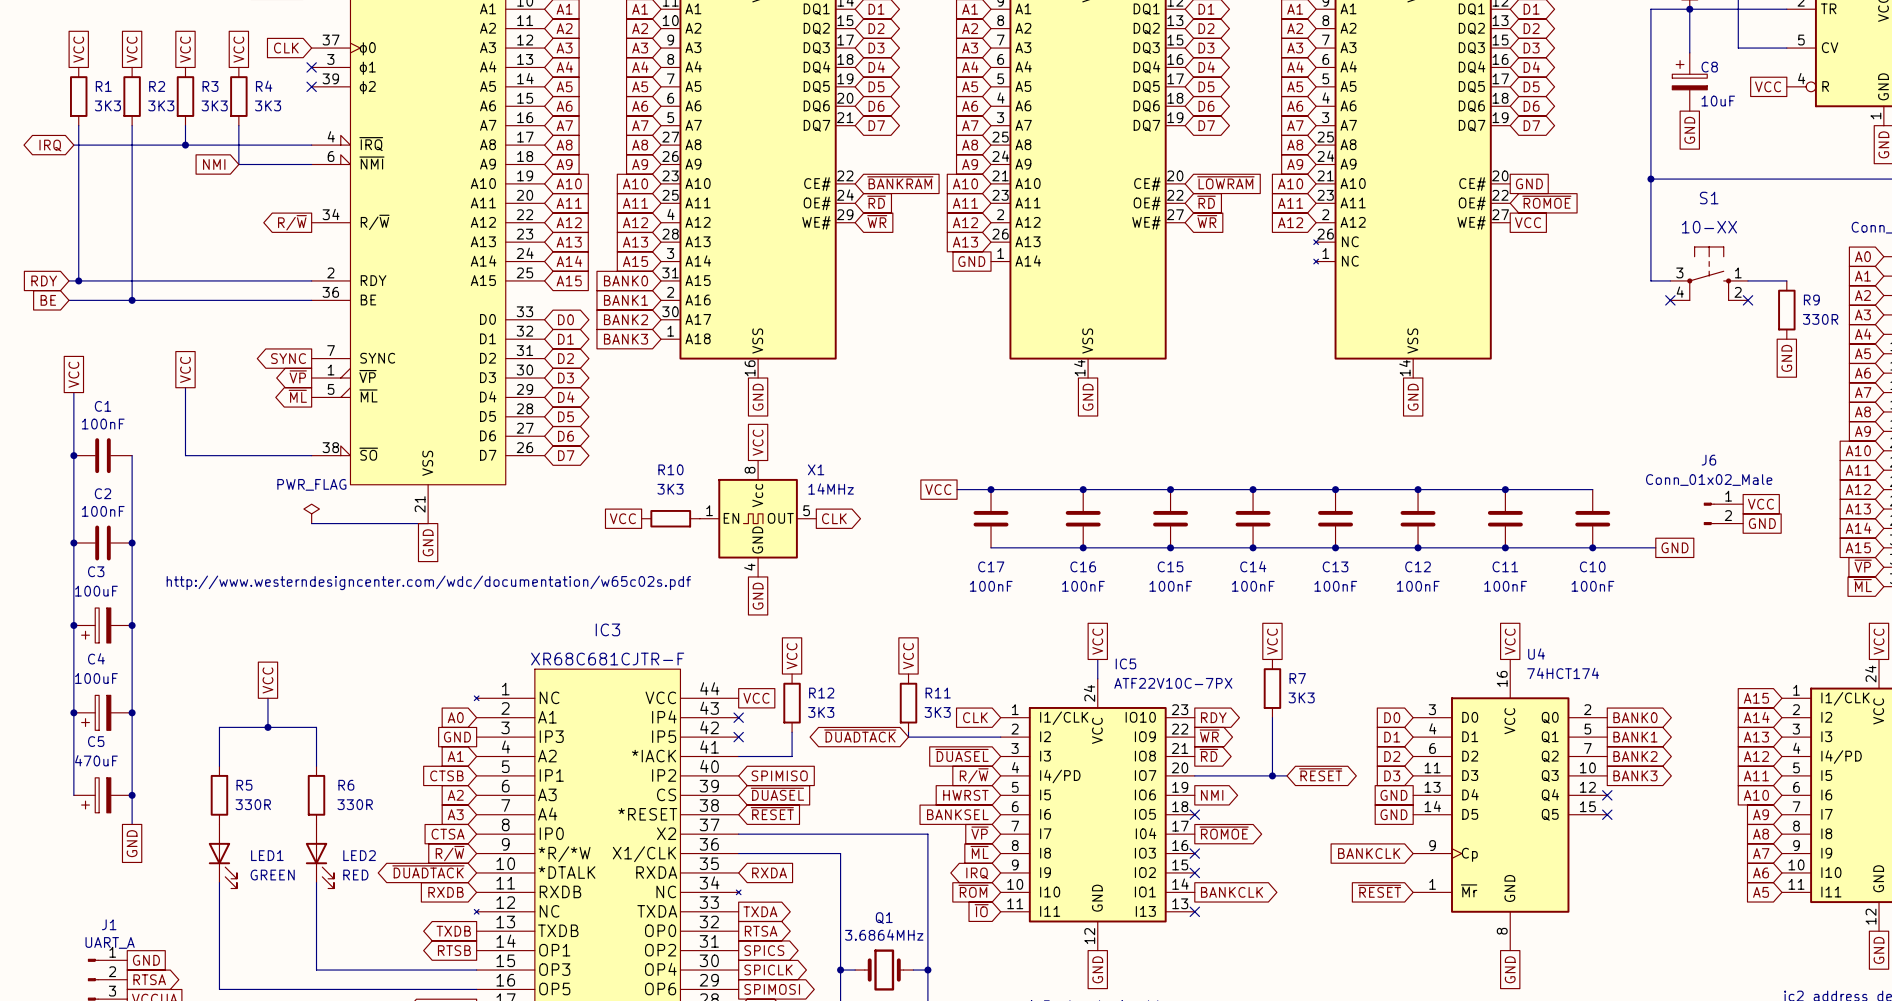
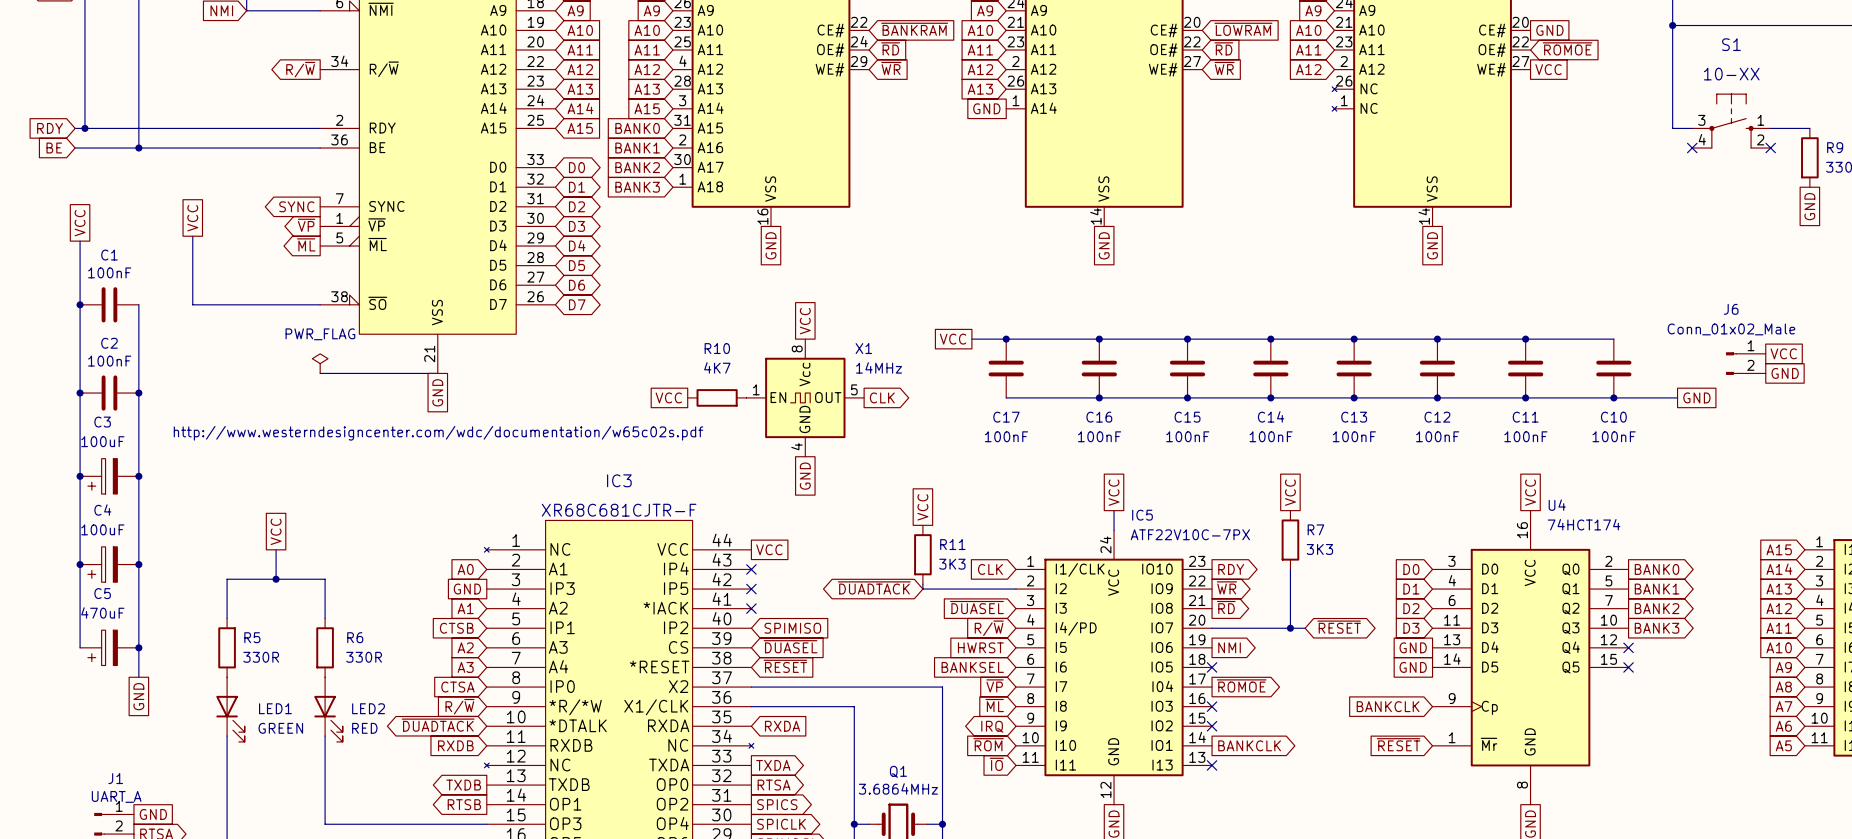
global label position: VCC (758, 442) -> VCC (805, 321)
R10 value: 3K3 (670, 489) -> 4K7 (717, 367)
global label position: VCC (622, 518) -> VCC (668, 397)
R10 position: (670, 518) -> (717, 397)
X1 position: (758, 518) -> (805, 397)
global label position: CLK (834, 518) -> CLK (882, 397)
global label position: GND (758, 596) -> GND (805, 476)
global label: VCC (792, 656) -> none
R12: 3K3 (792, 703) -> none
wire: (792, 732) (792, 756) (738, 756) -> none
no-connect mark: none -> (751, 608)

